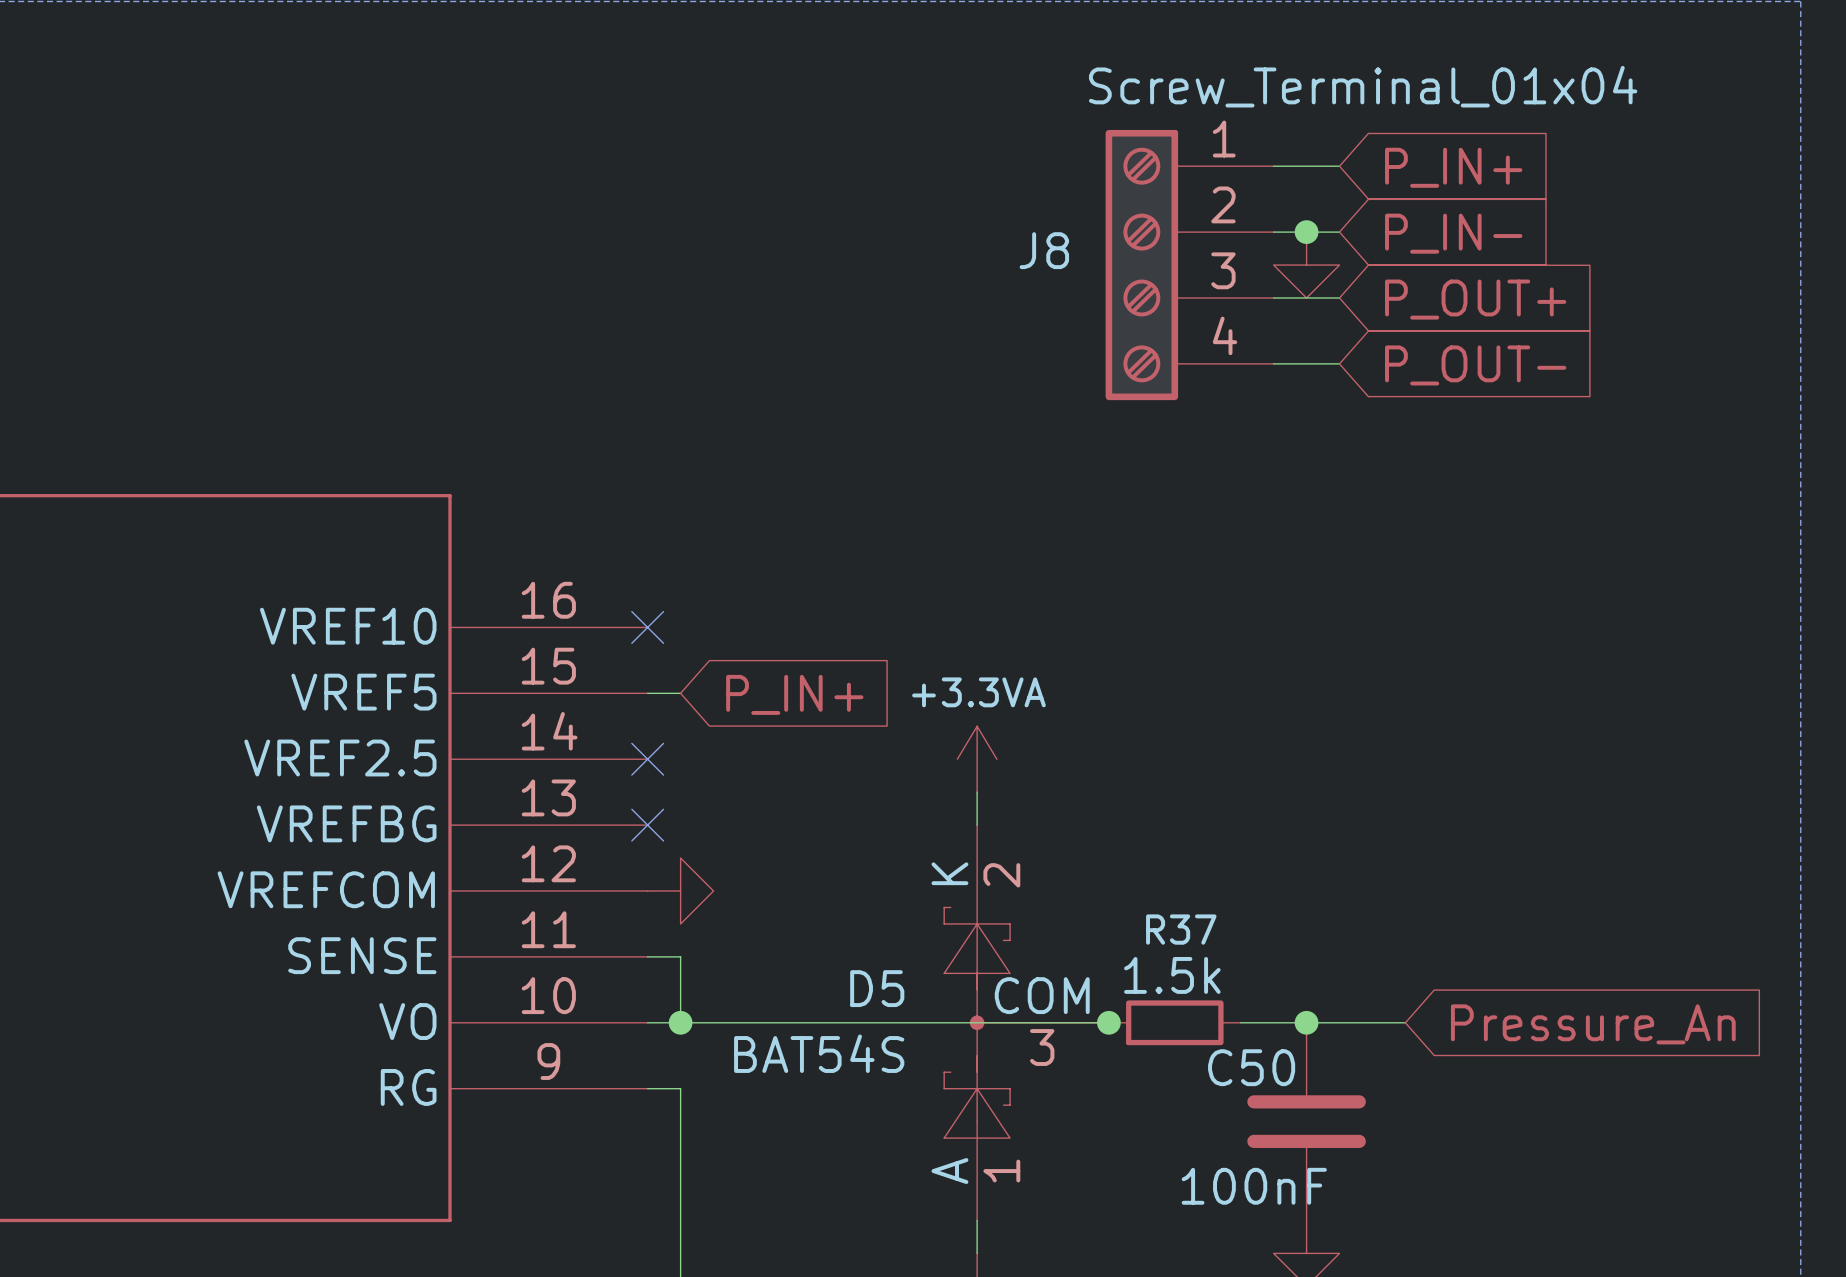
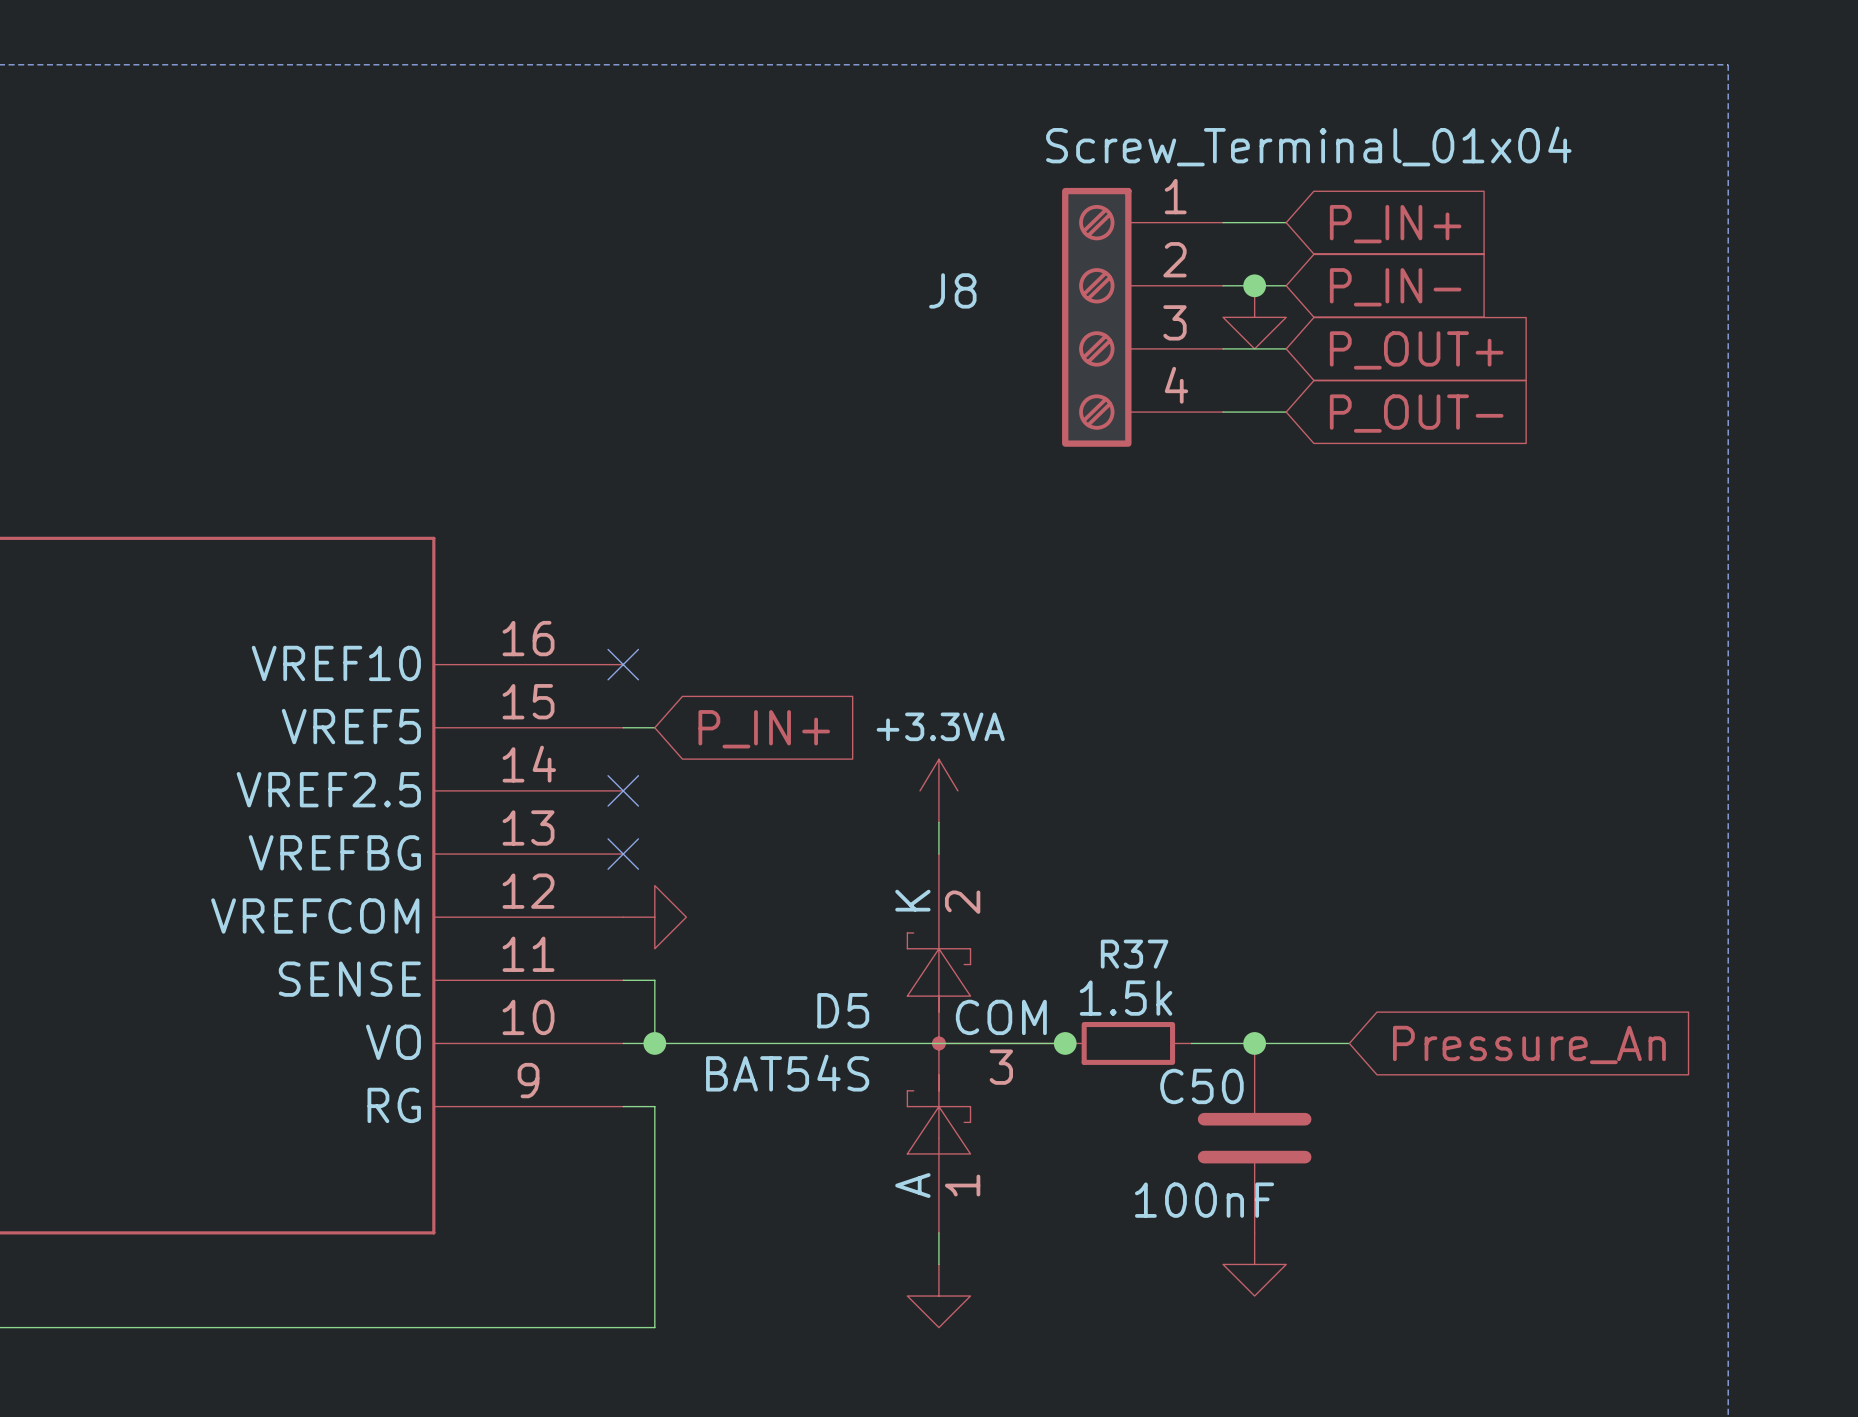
J8 name position: J8 (1044, 250) -> J8 (952, 290)

